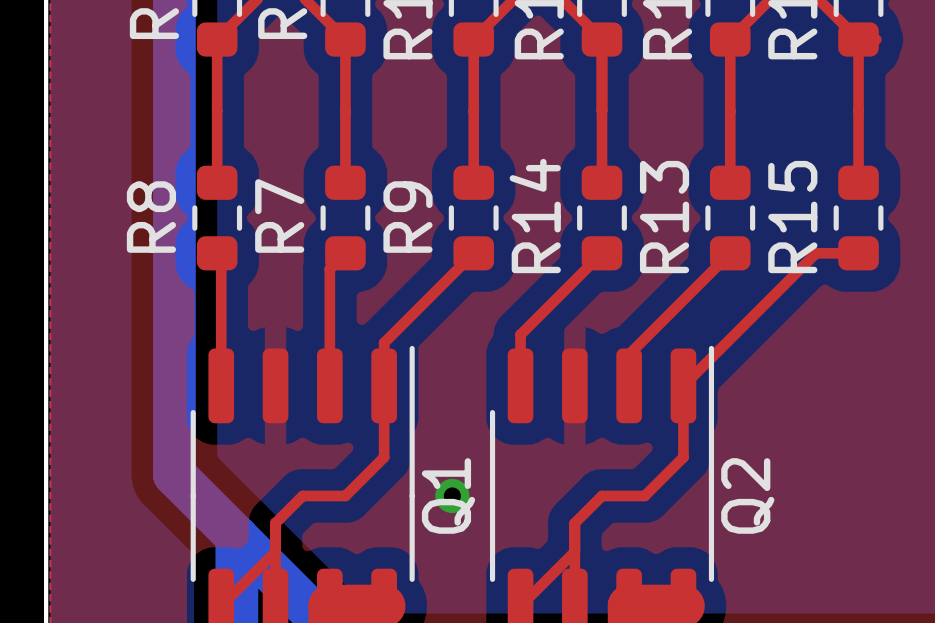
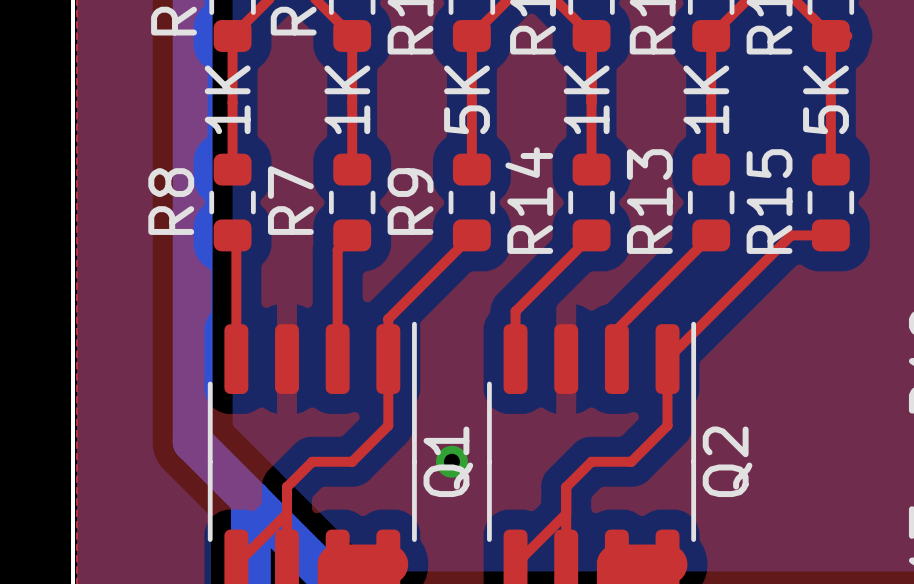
text: none -> 1K (227, 99)
text: none -> 1K (347, 99)
text: none -> 5K (467, 99)
text: none -> 1K (586, 99)
text: none -> 1K (706, 99)
text: none -> 5K (825, 99)

